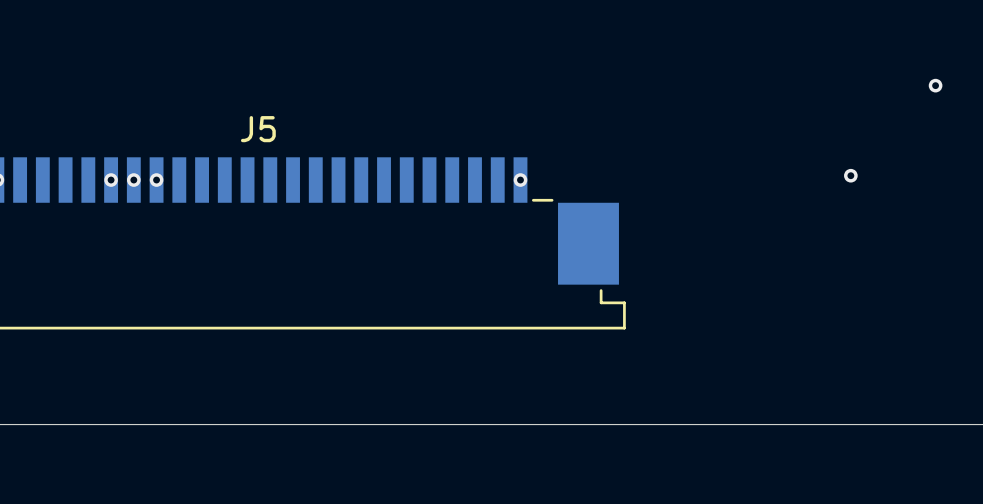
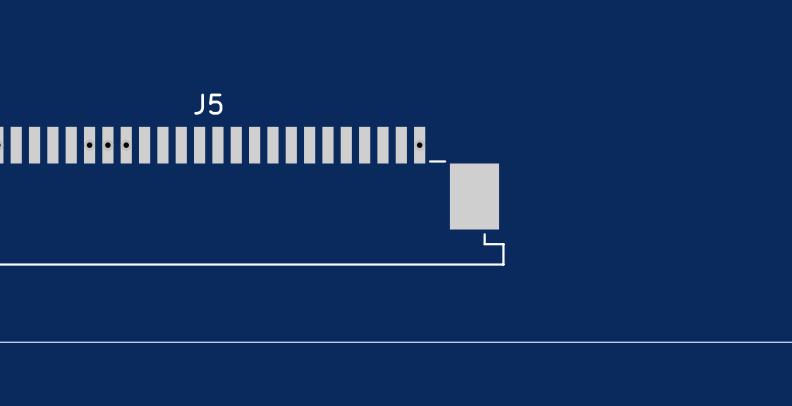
via: (935, 85) -> none
via: (850, 175) -> none

